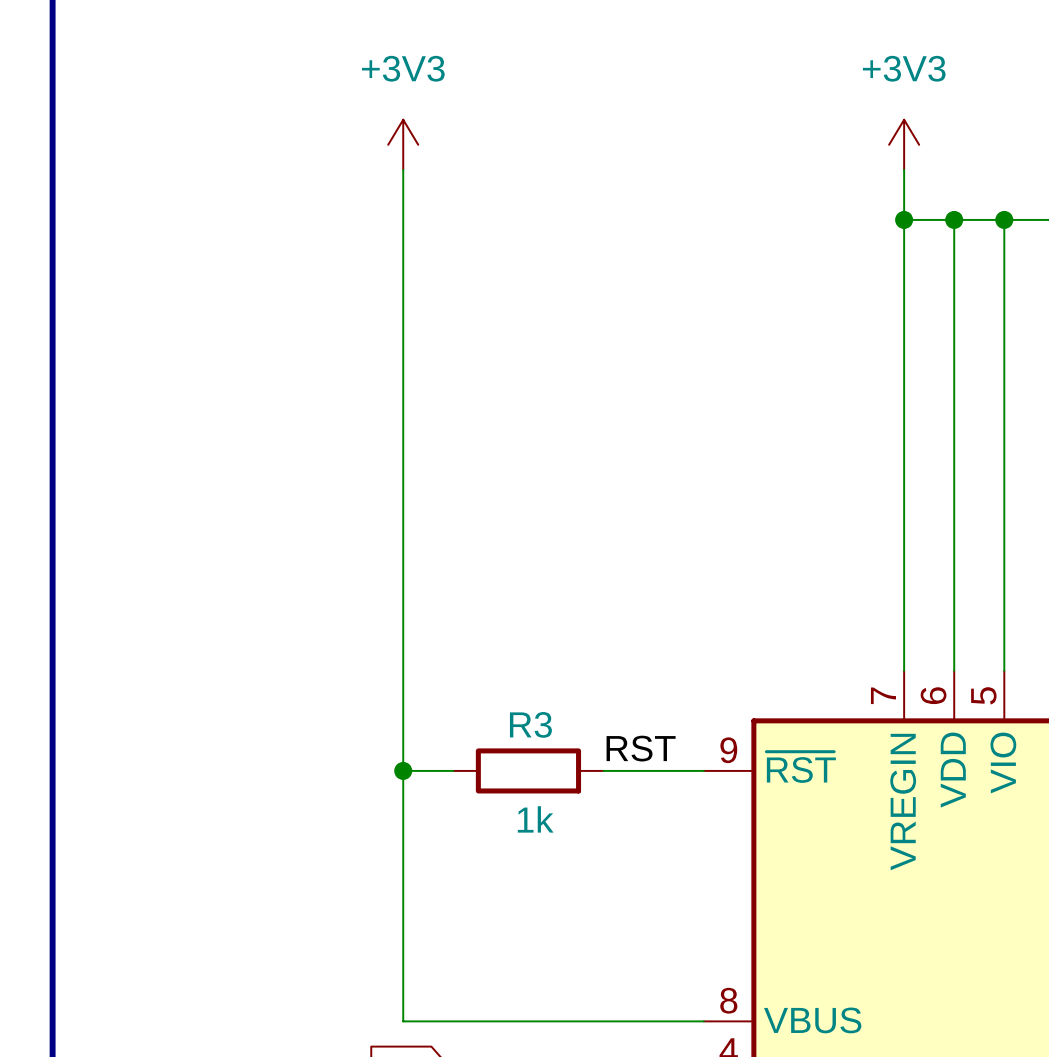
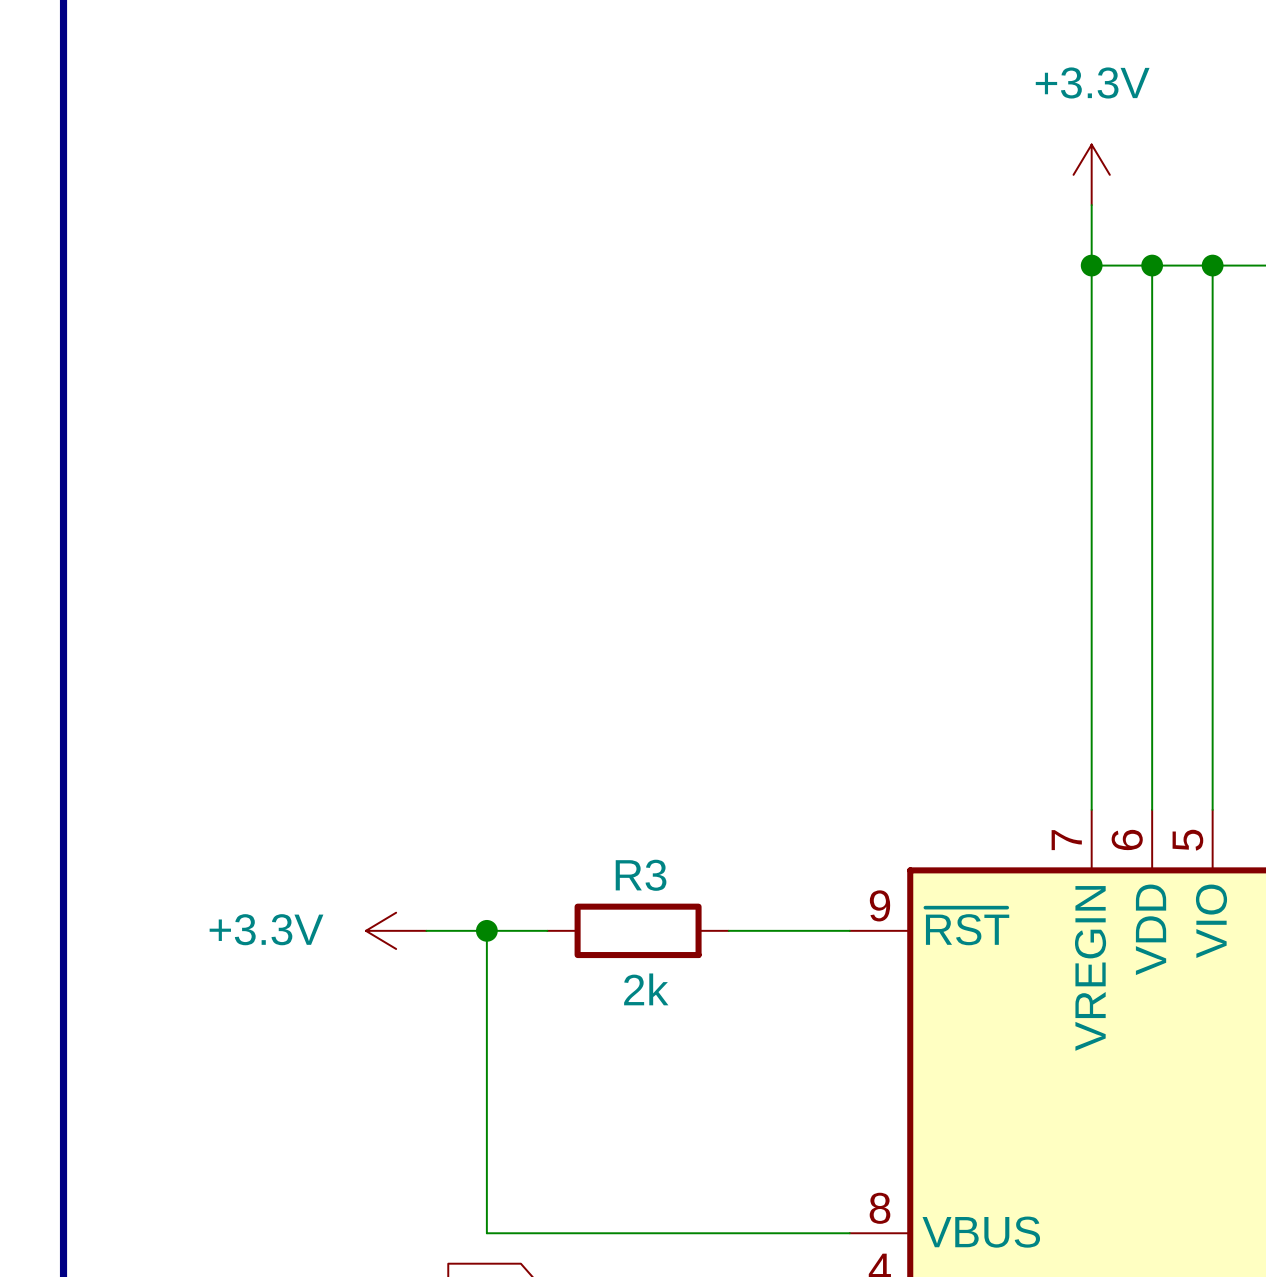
power symbol: +3V3 (403, 144) -> none
power symbol: +3V3 (904, 144) -> +3.3V (1091, 174)
wire: (403, 169) (403, 770) -> (426, 930) (486, 930)
label: RST (641, 748) -> none
power symbol: none -> +3.3V (396, 930)
R3 value: 1k (535, 819) -> 2k (646, 989)

